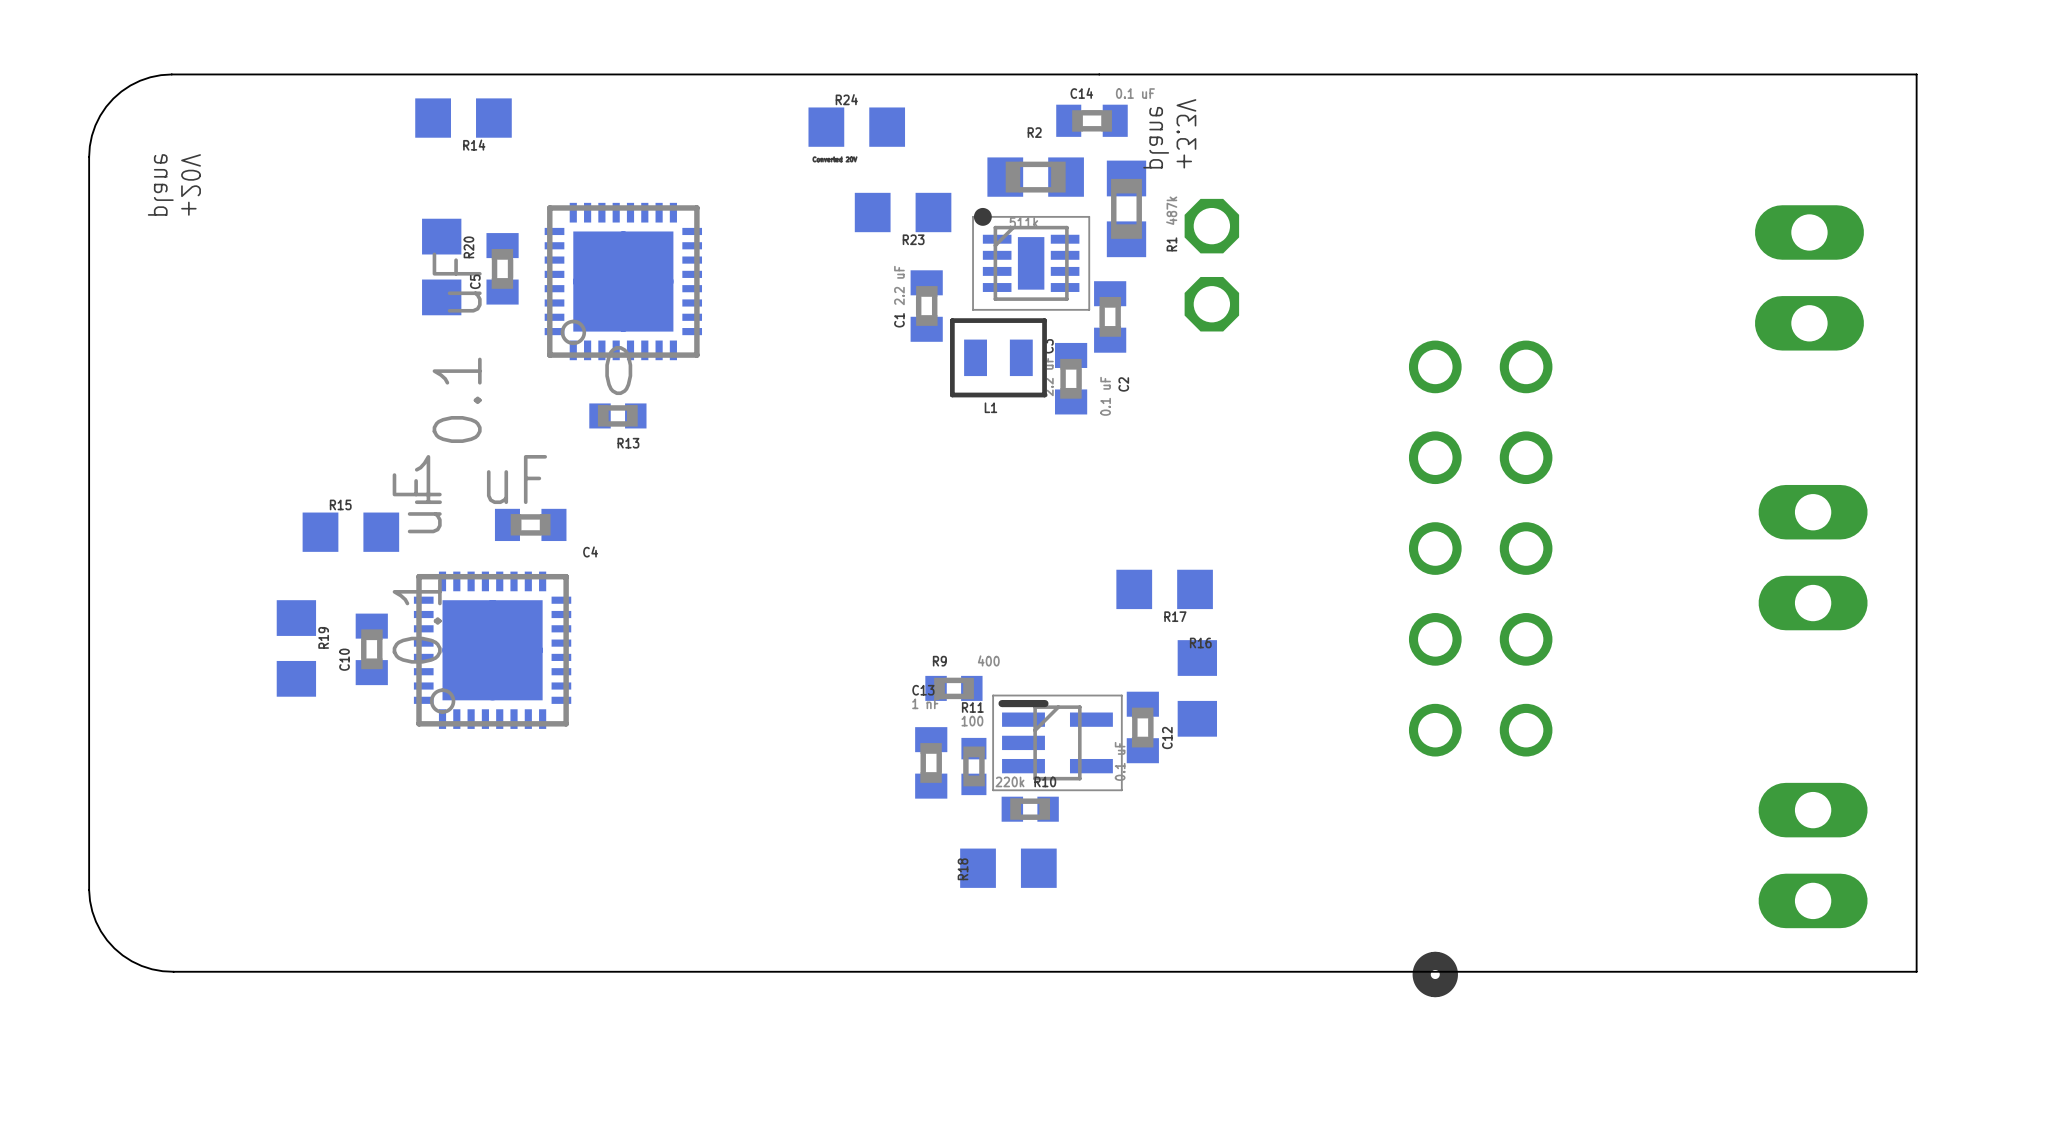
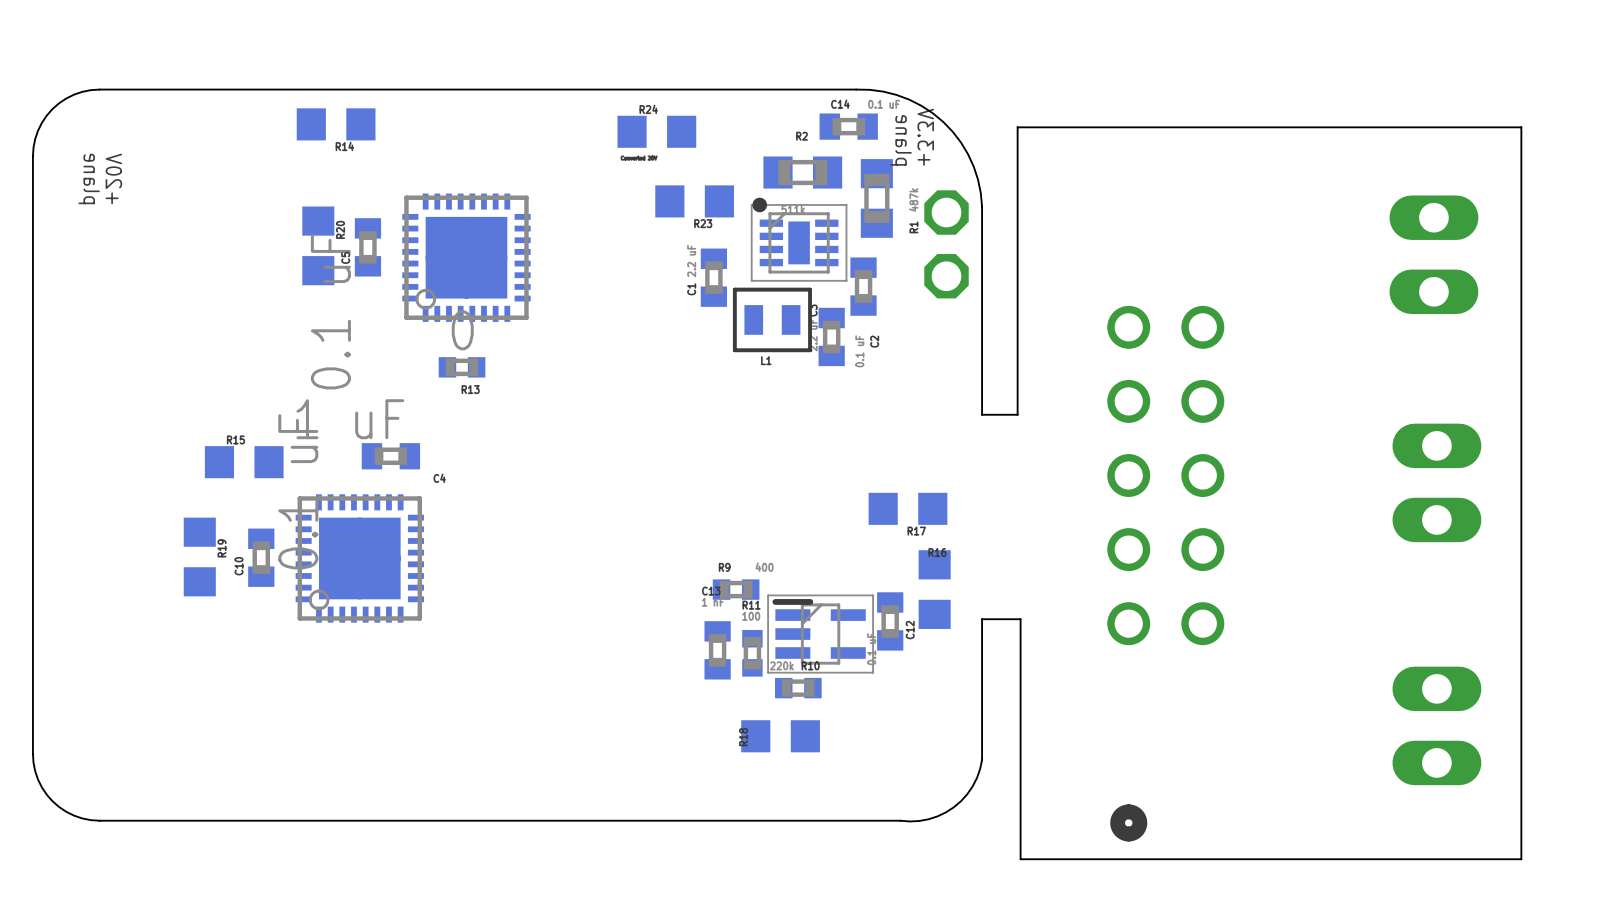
board edge: (1916, 121) (1916, 74) (171, 74) (140, 80) (121, 91) (106, 106) (95, 125) (89, 157) (89, 890) (95, 921) (114, 948) (141, 965) (173, 971) -> (1521, 127) (1017, 127) (1017, 414) (982, 414) (982, 206) (978, 179) (968, 154) (952, 131) (932, 113) (921, 105) (896, 94) (869, 89) (856, 89) (99, 89) (74, 94) (59, 103) (46, 115) (38, 130) (32, 156) (32, 754) (38, 779) (52, 801) (74, 815) (99, 820)
board edge: (1916, 971) (1155, 971) -> (1521, 820) (1521, 859) (1020, 859) (1020, 619) (982, 619) (982, 759) (972, 786) (961, 801) (946, 812) (928, 819) (900, 820)

